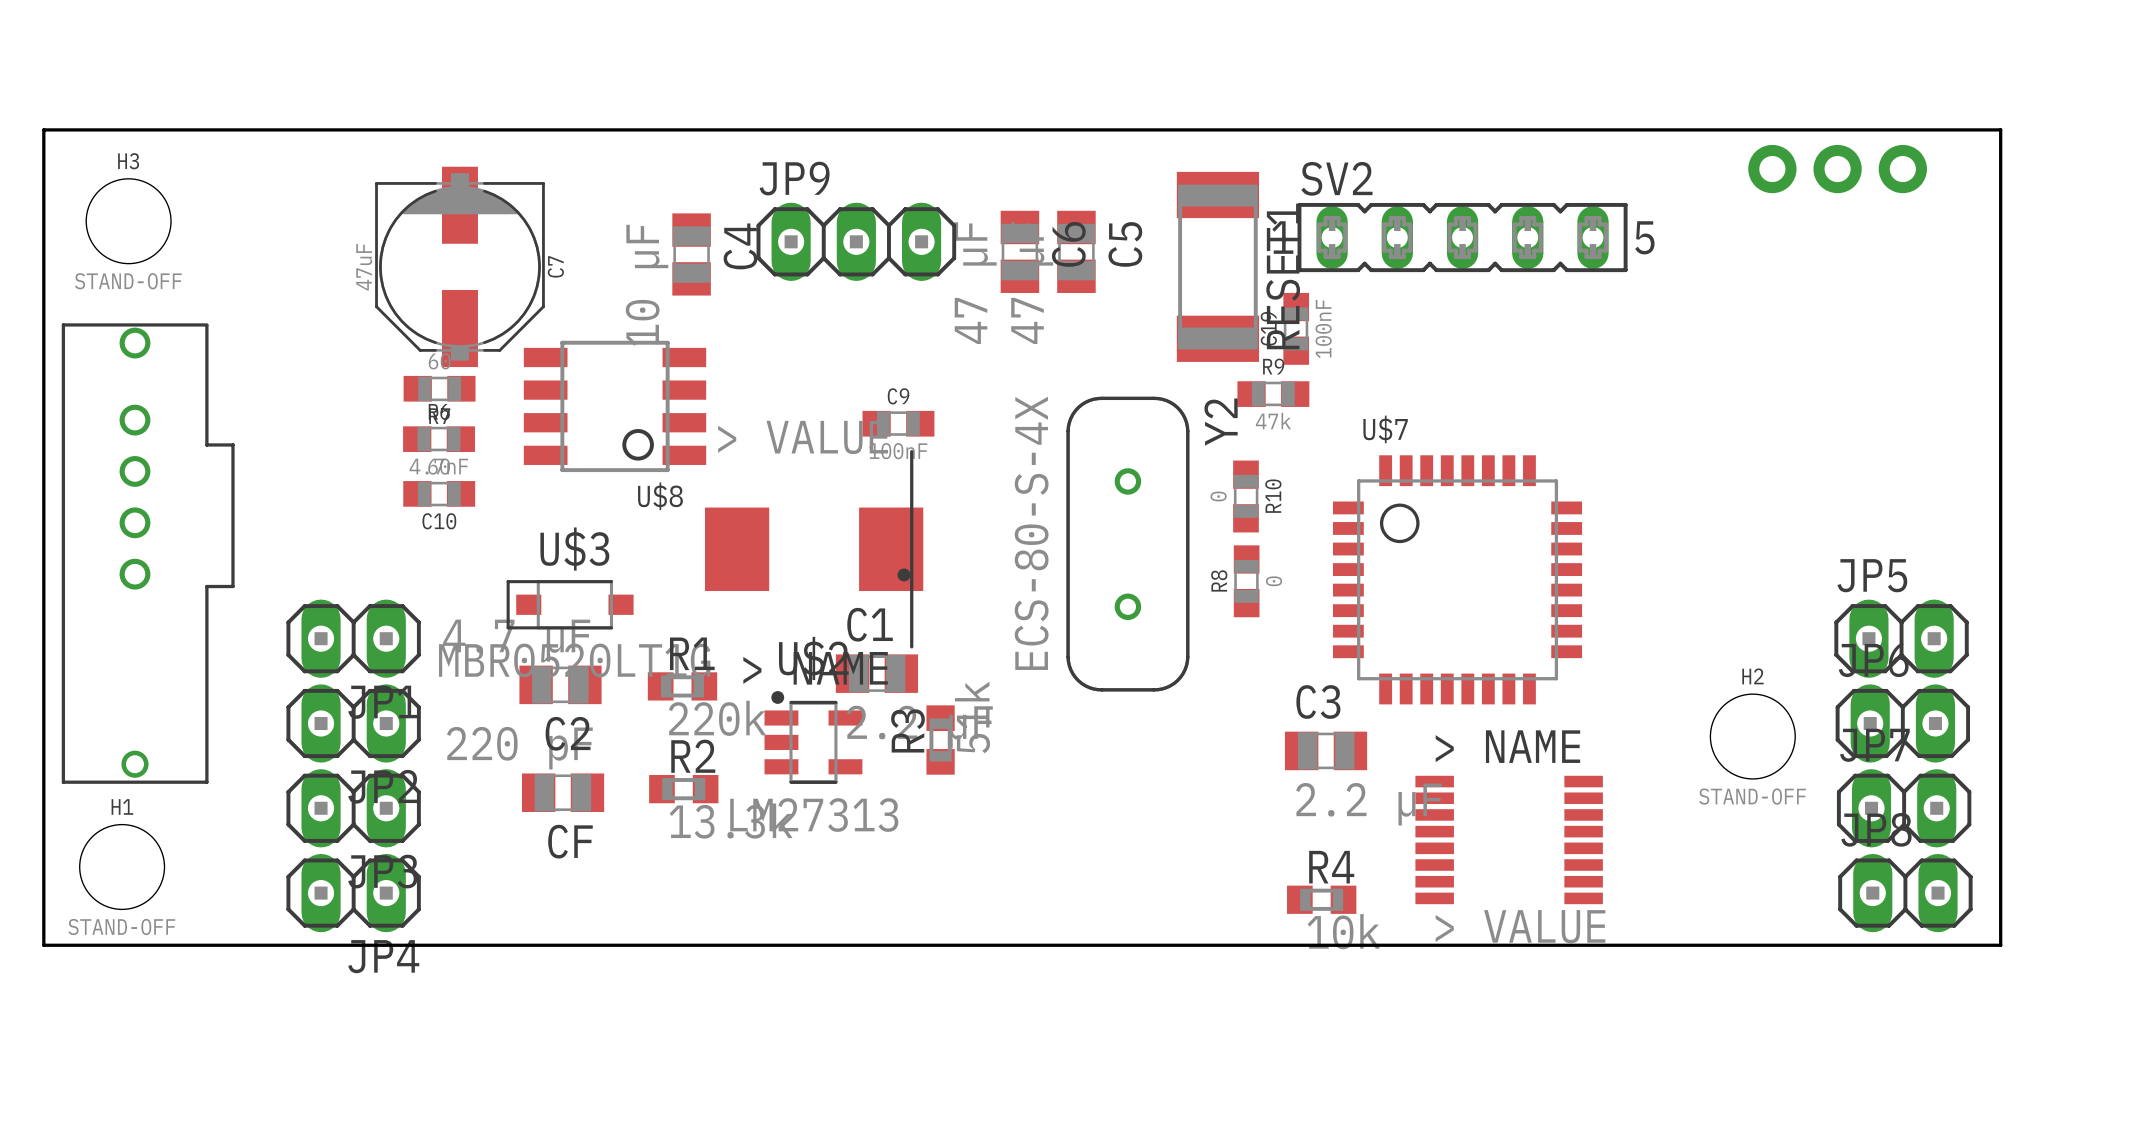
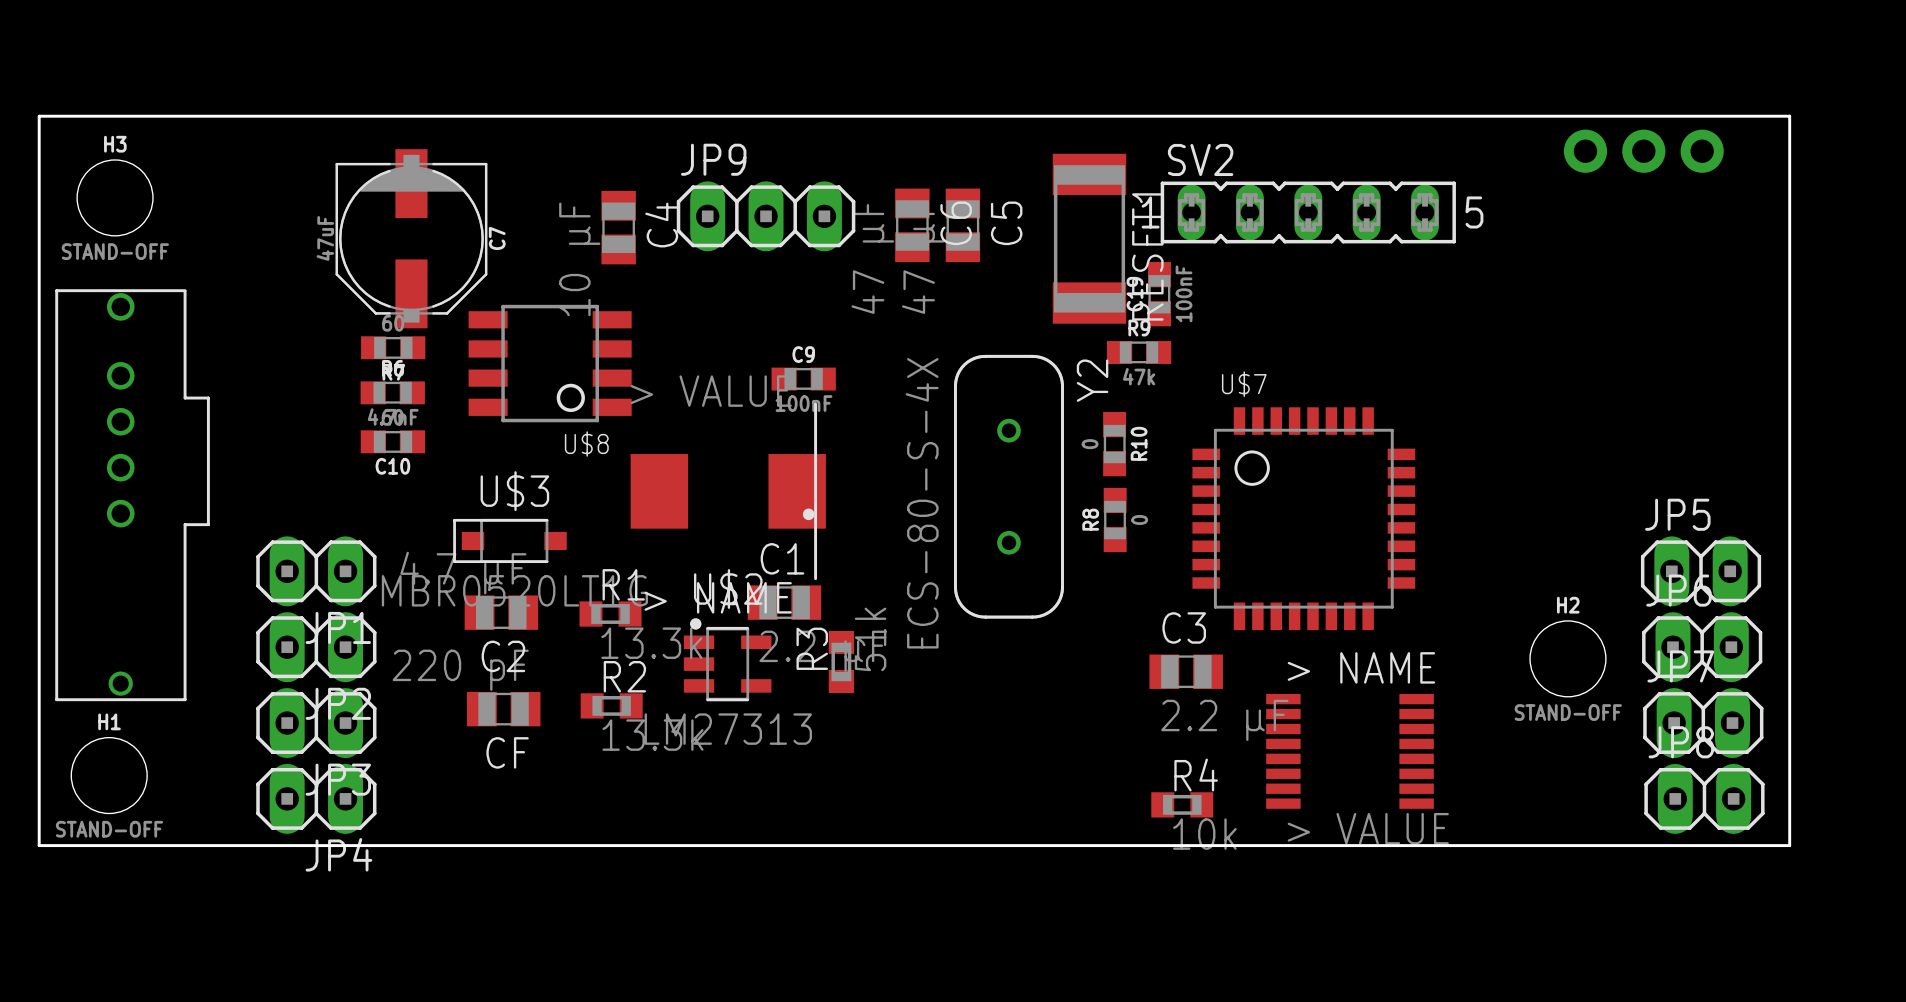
R1 value: 220k (717, 718) -> 13.3k (651, 643)

